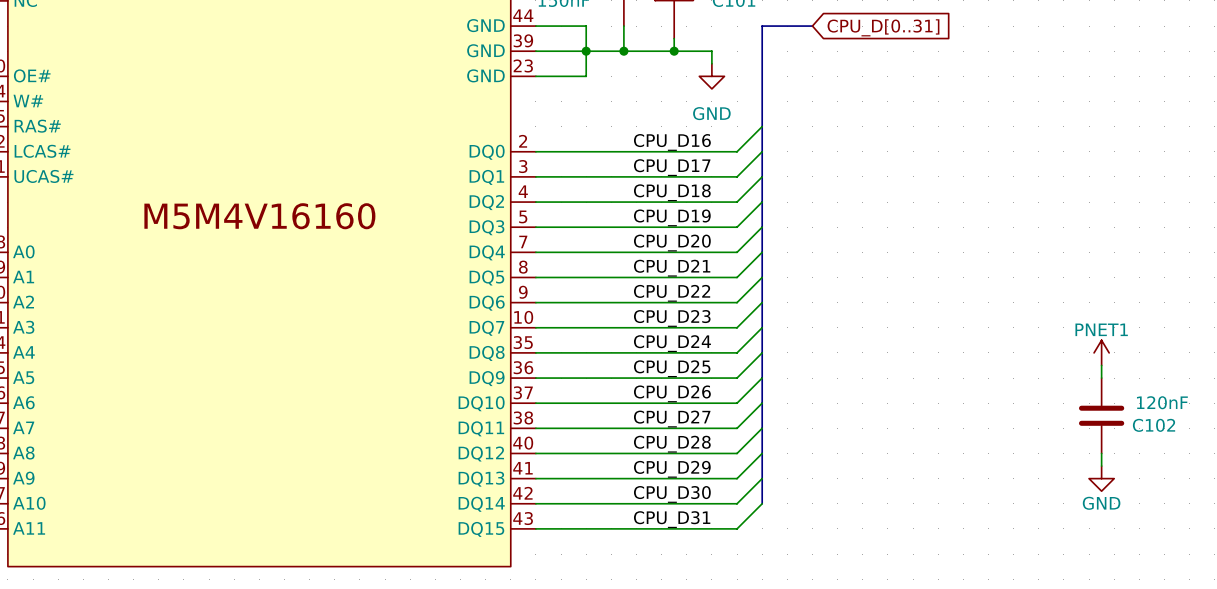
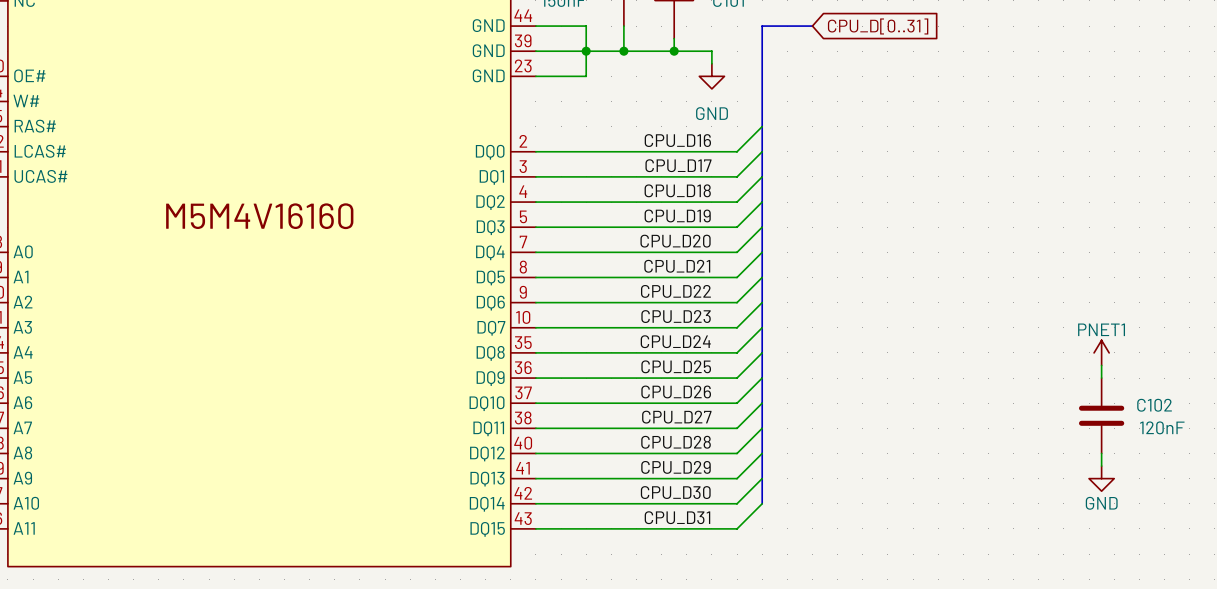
C102 value position: 120nF (1162, 402) -> 120nF (1162, 427)
C102 name position: C102 (1154, 425) -> C102 (1154, 405)

